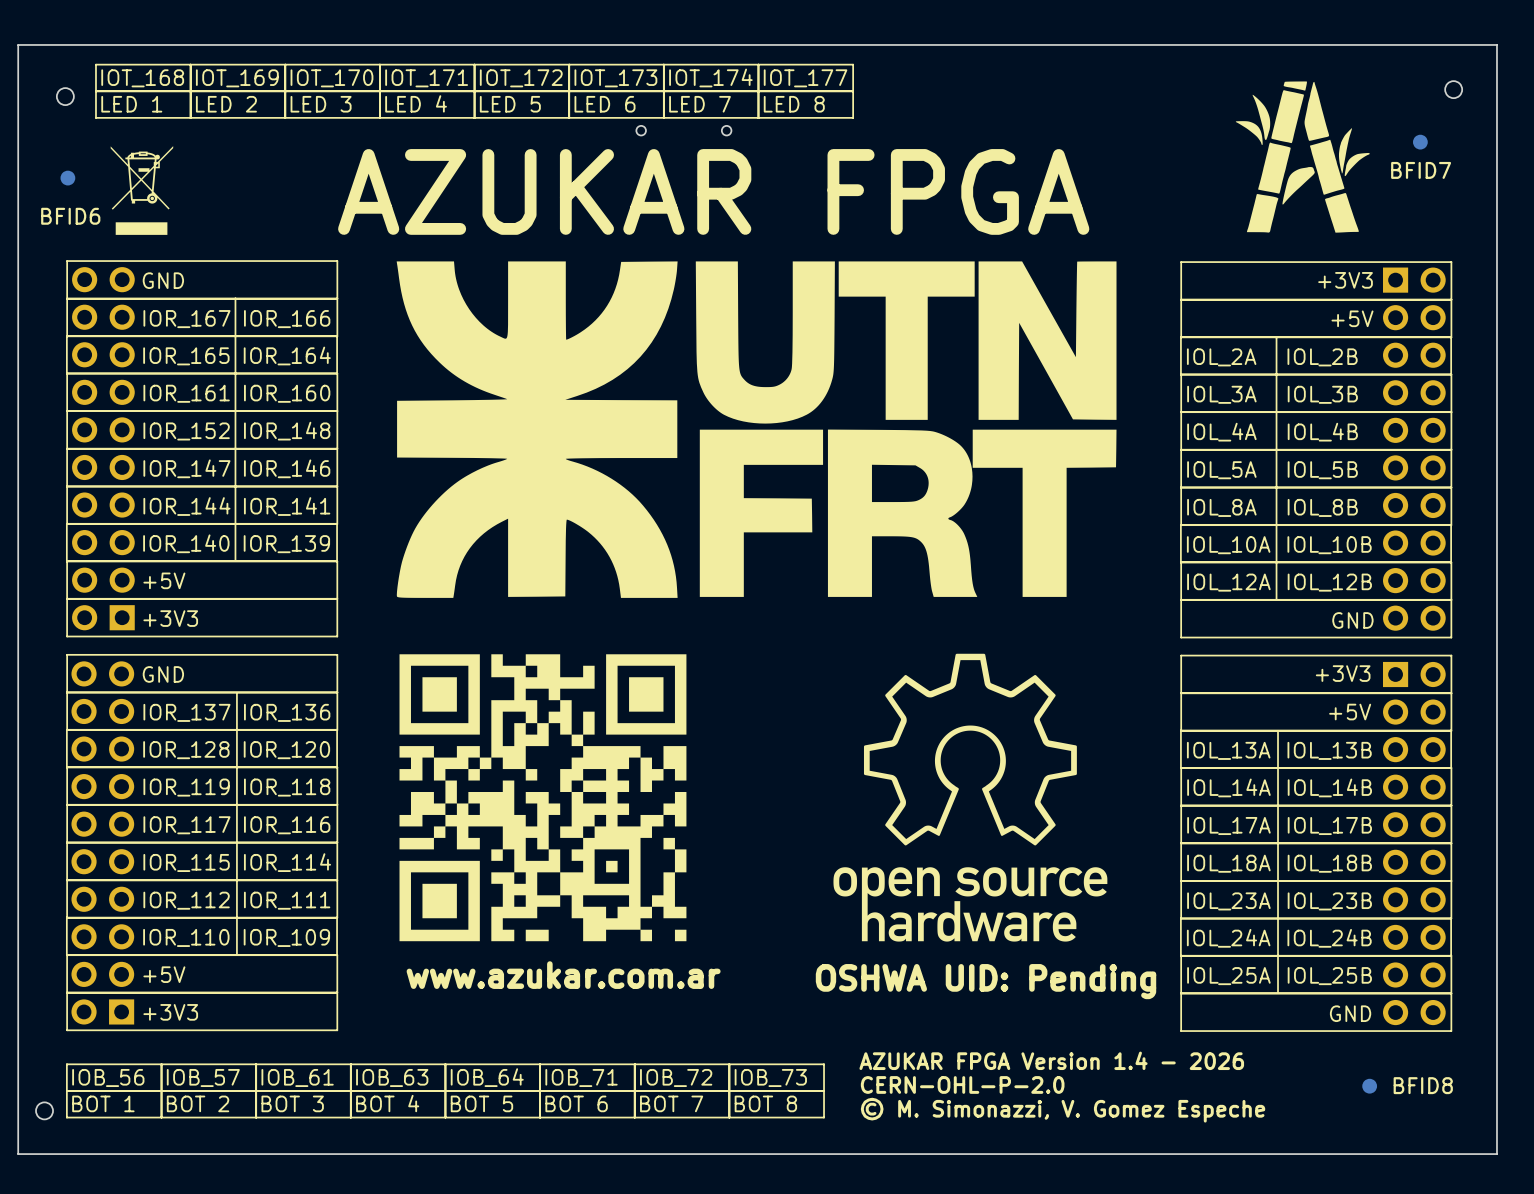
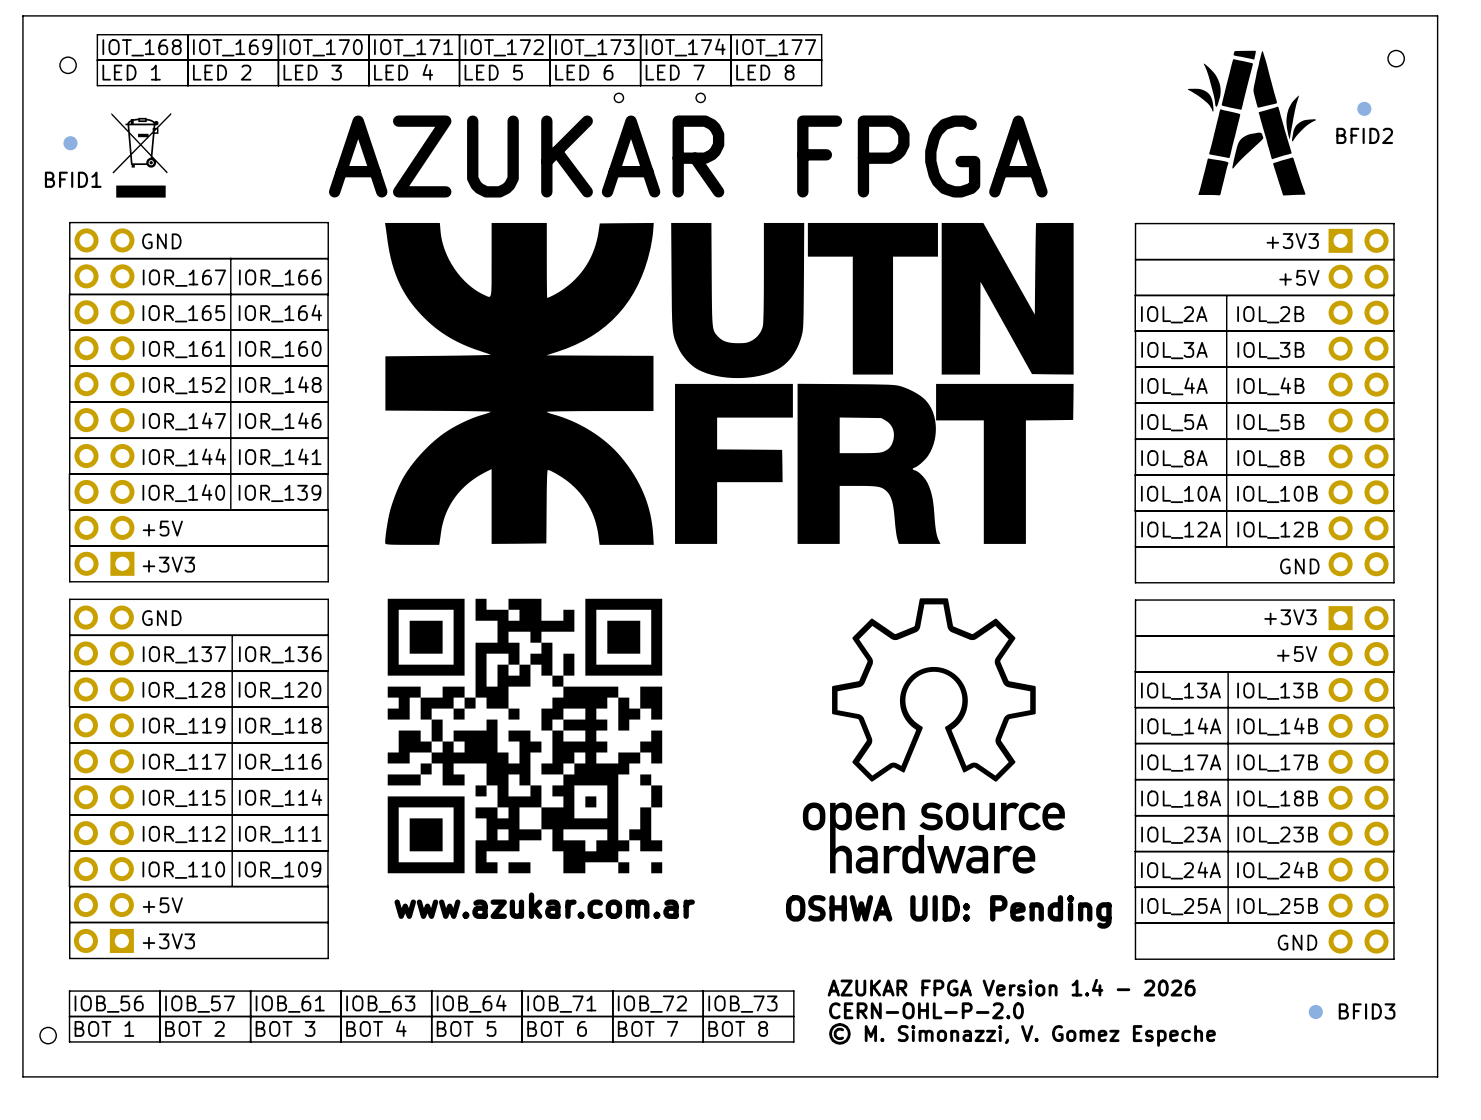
BFID7 name: BFID7 (1421, 170) -> BFID2 (1364, 135)
BFID6 name: BFID6 (70, 216) -> BFID1 (73, 179)
BFID8 name: BFID8 (1423, 1085) -> BFID3 (1367, 1011)

